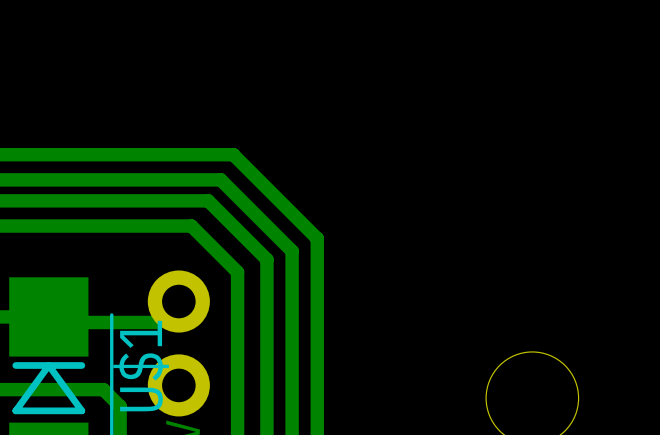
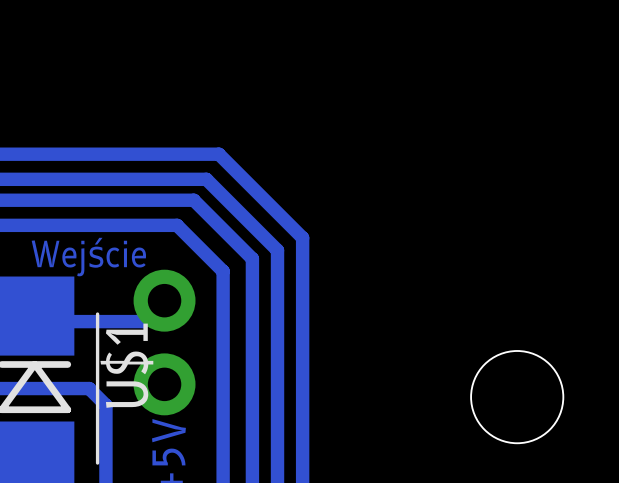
text: none -> Wejście (88, 257)

